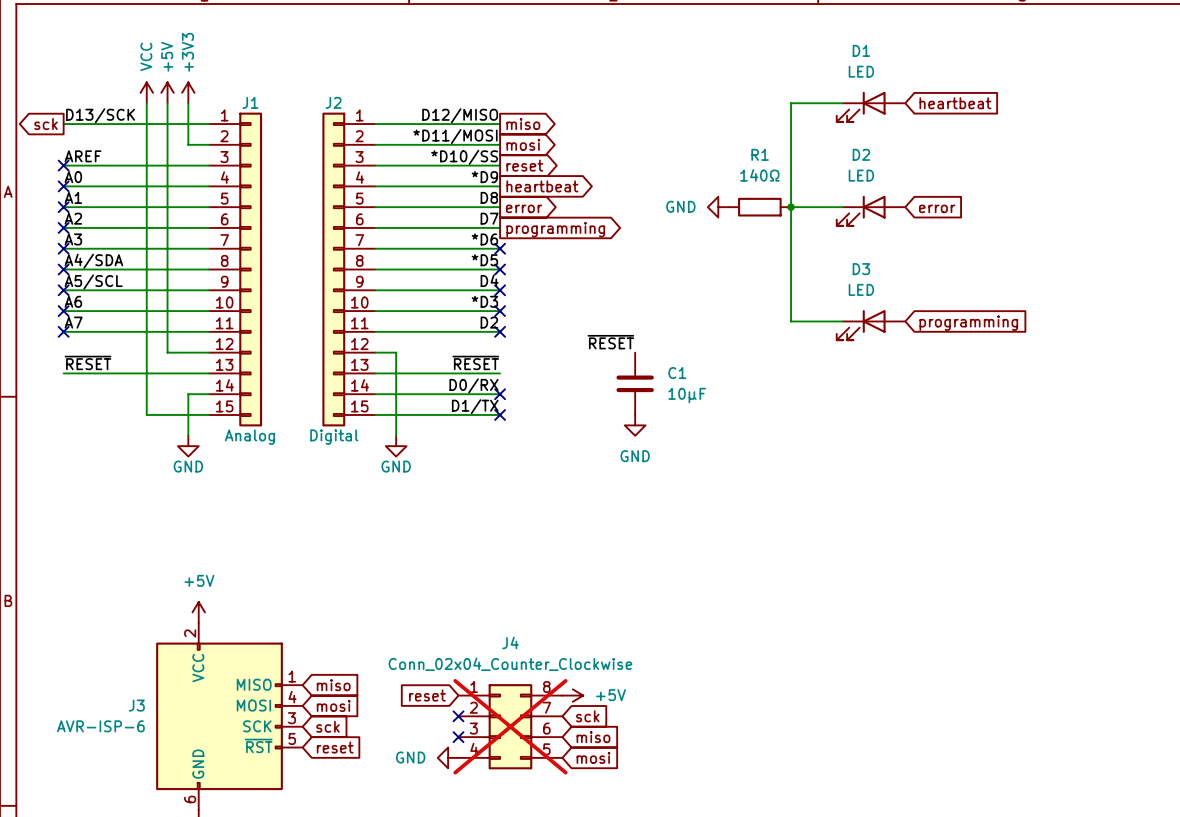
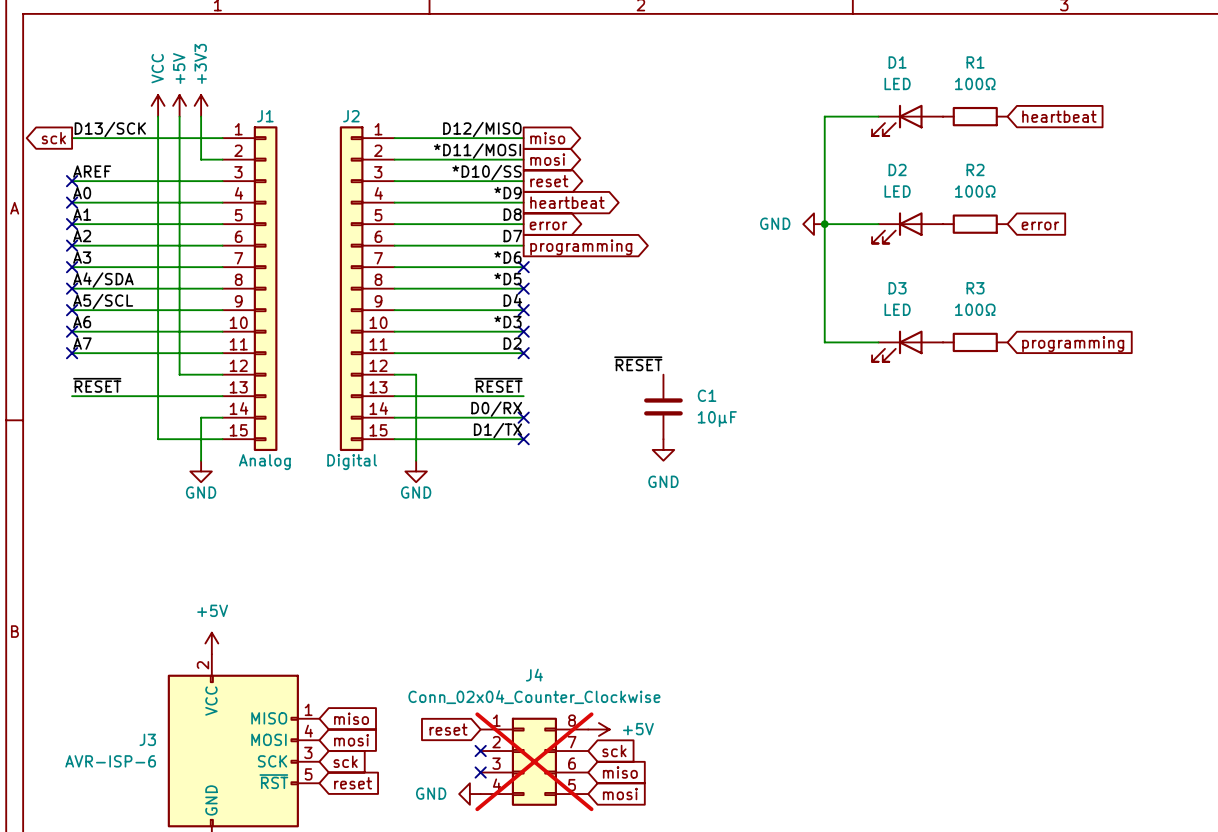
global label position: heartbeat (955, 103) -> heartbeat (1059, 116)
R1 value: 140Ω (759, 175) -> 100Ω (975, 83)
power symbol position: GND (718, 207) -> GND (813, 224)
R1 position: (759, 207) -> (975, 116)
R2: none -> 100Ω (975, 224)
global label position: error (937, 208) -> error (1040, 225)
R3: none -> 100Ω (975, 342)
global label position: programming (968, 323) -> programming (1073, 344)

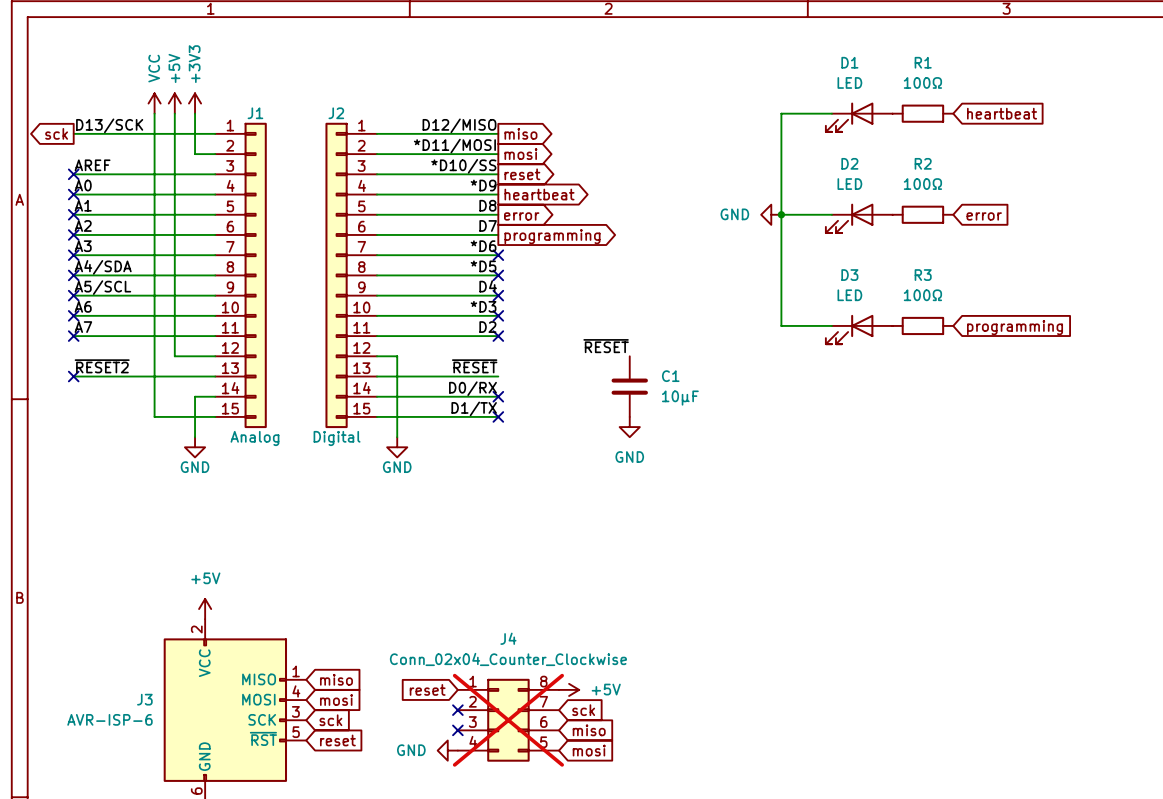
label: ~{RESET} (97, 385) -> ~{RESET2} (102, 366)
no-connect mark: none -> (73, 376)

